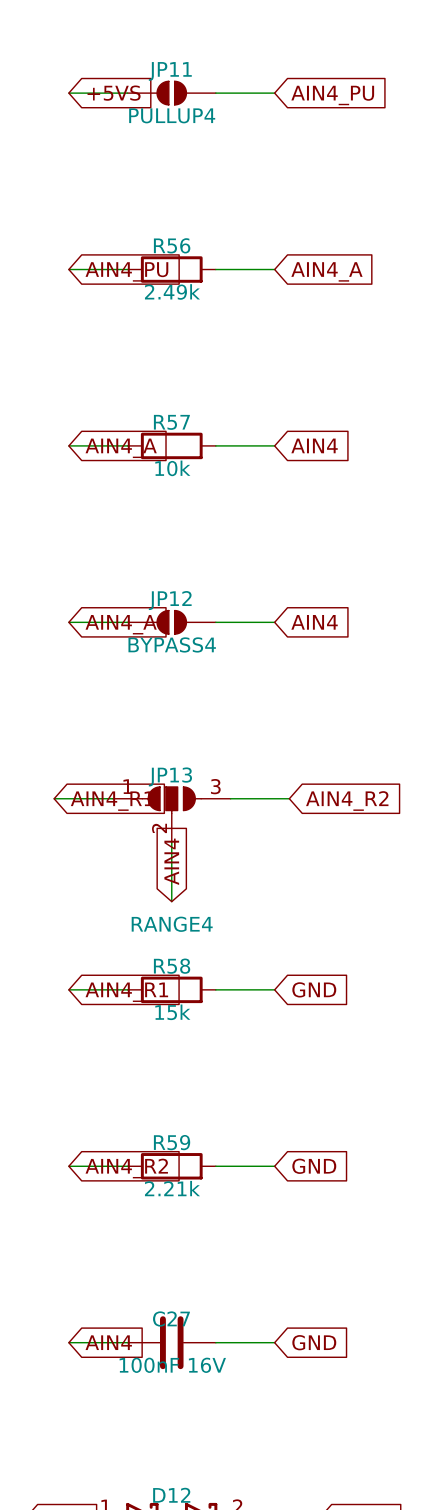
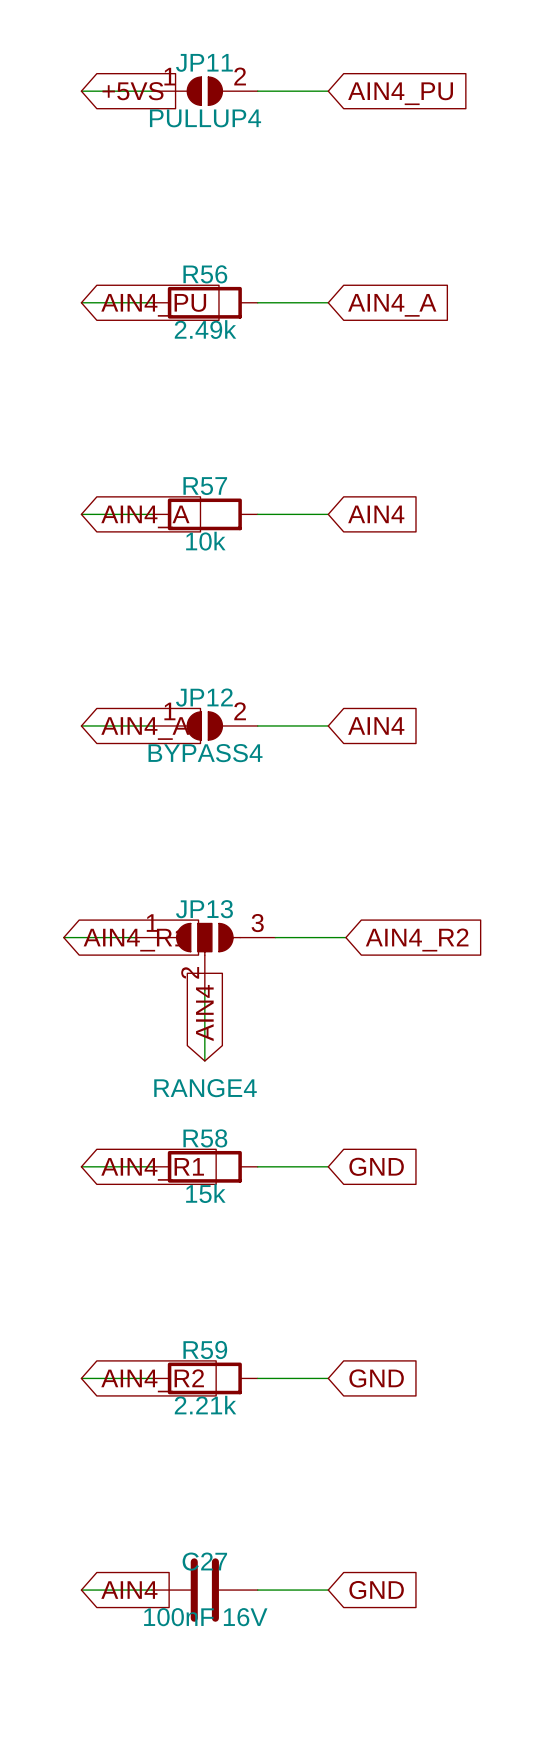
JP11 pin number: none -> 1 (169, 76)
JP11 pin number: none -> 2 (240, 76)
JP12 pin number: none -> 1 (169, 711)
JP12 pin number: none -> 2 (240, 711)

